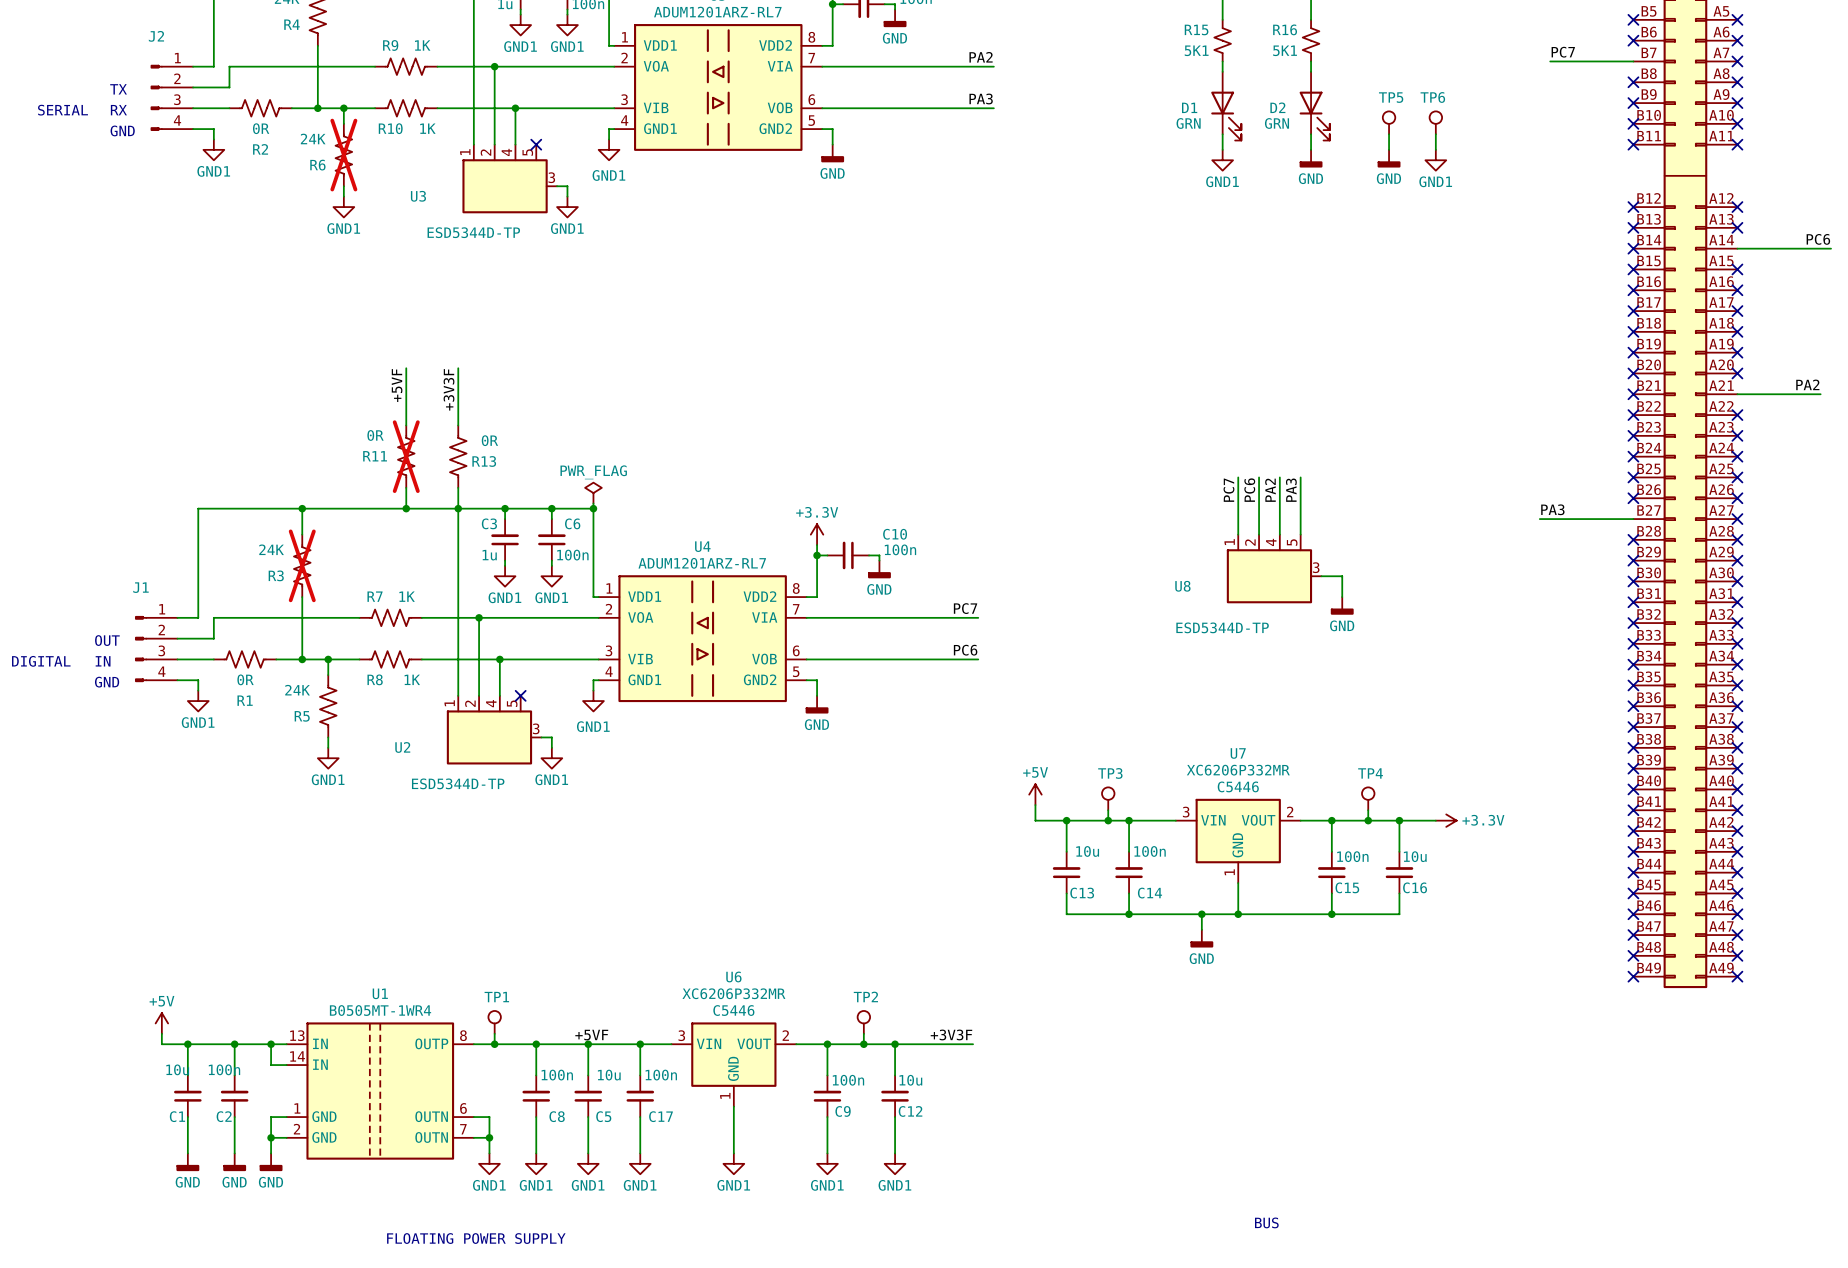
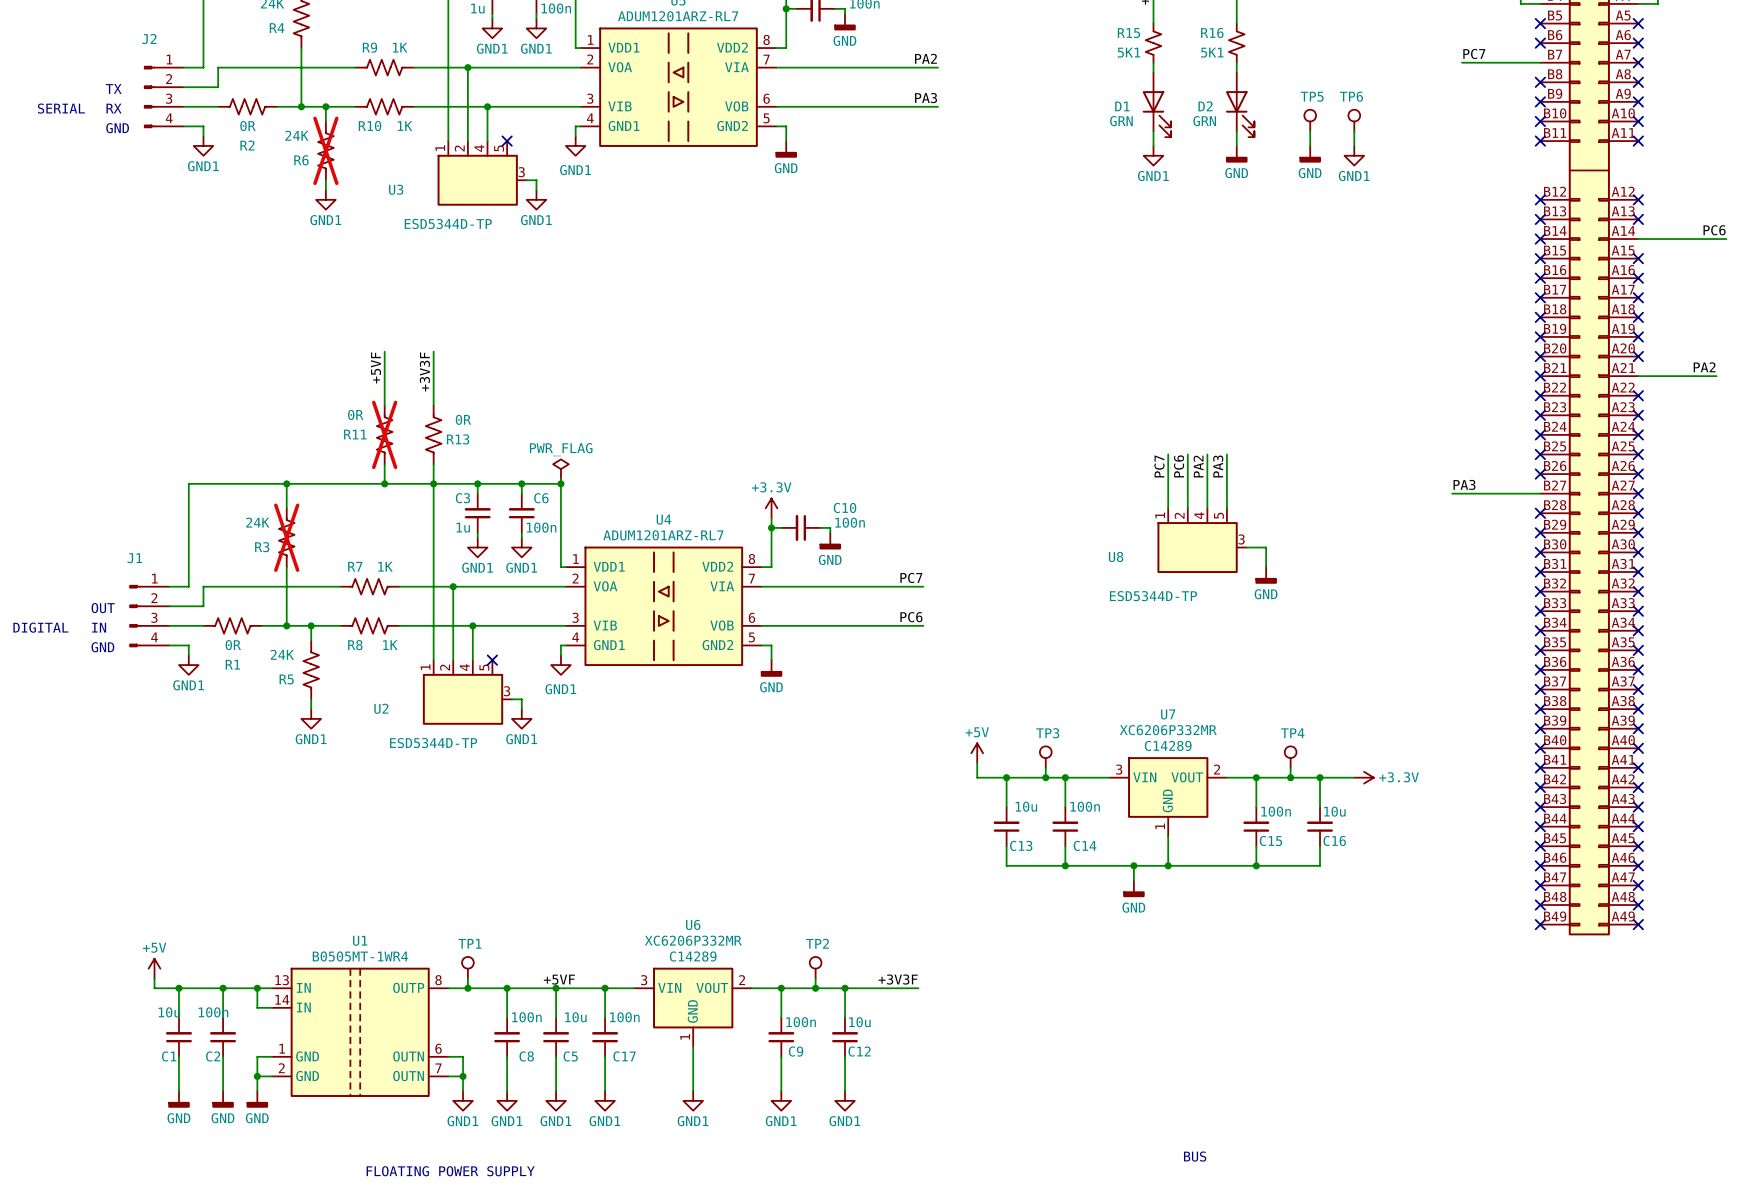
U7 text: C5446 (1238, 786) -> C14289 (1168, 745)
U6 text: C5446 (733, 1010) -> C14289 (693, 956)

